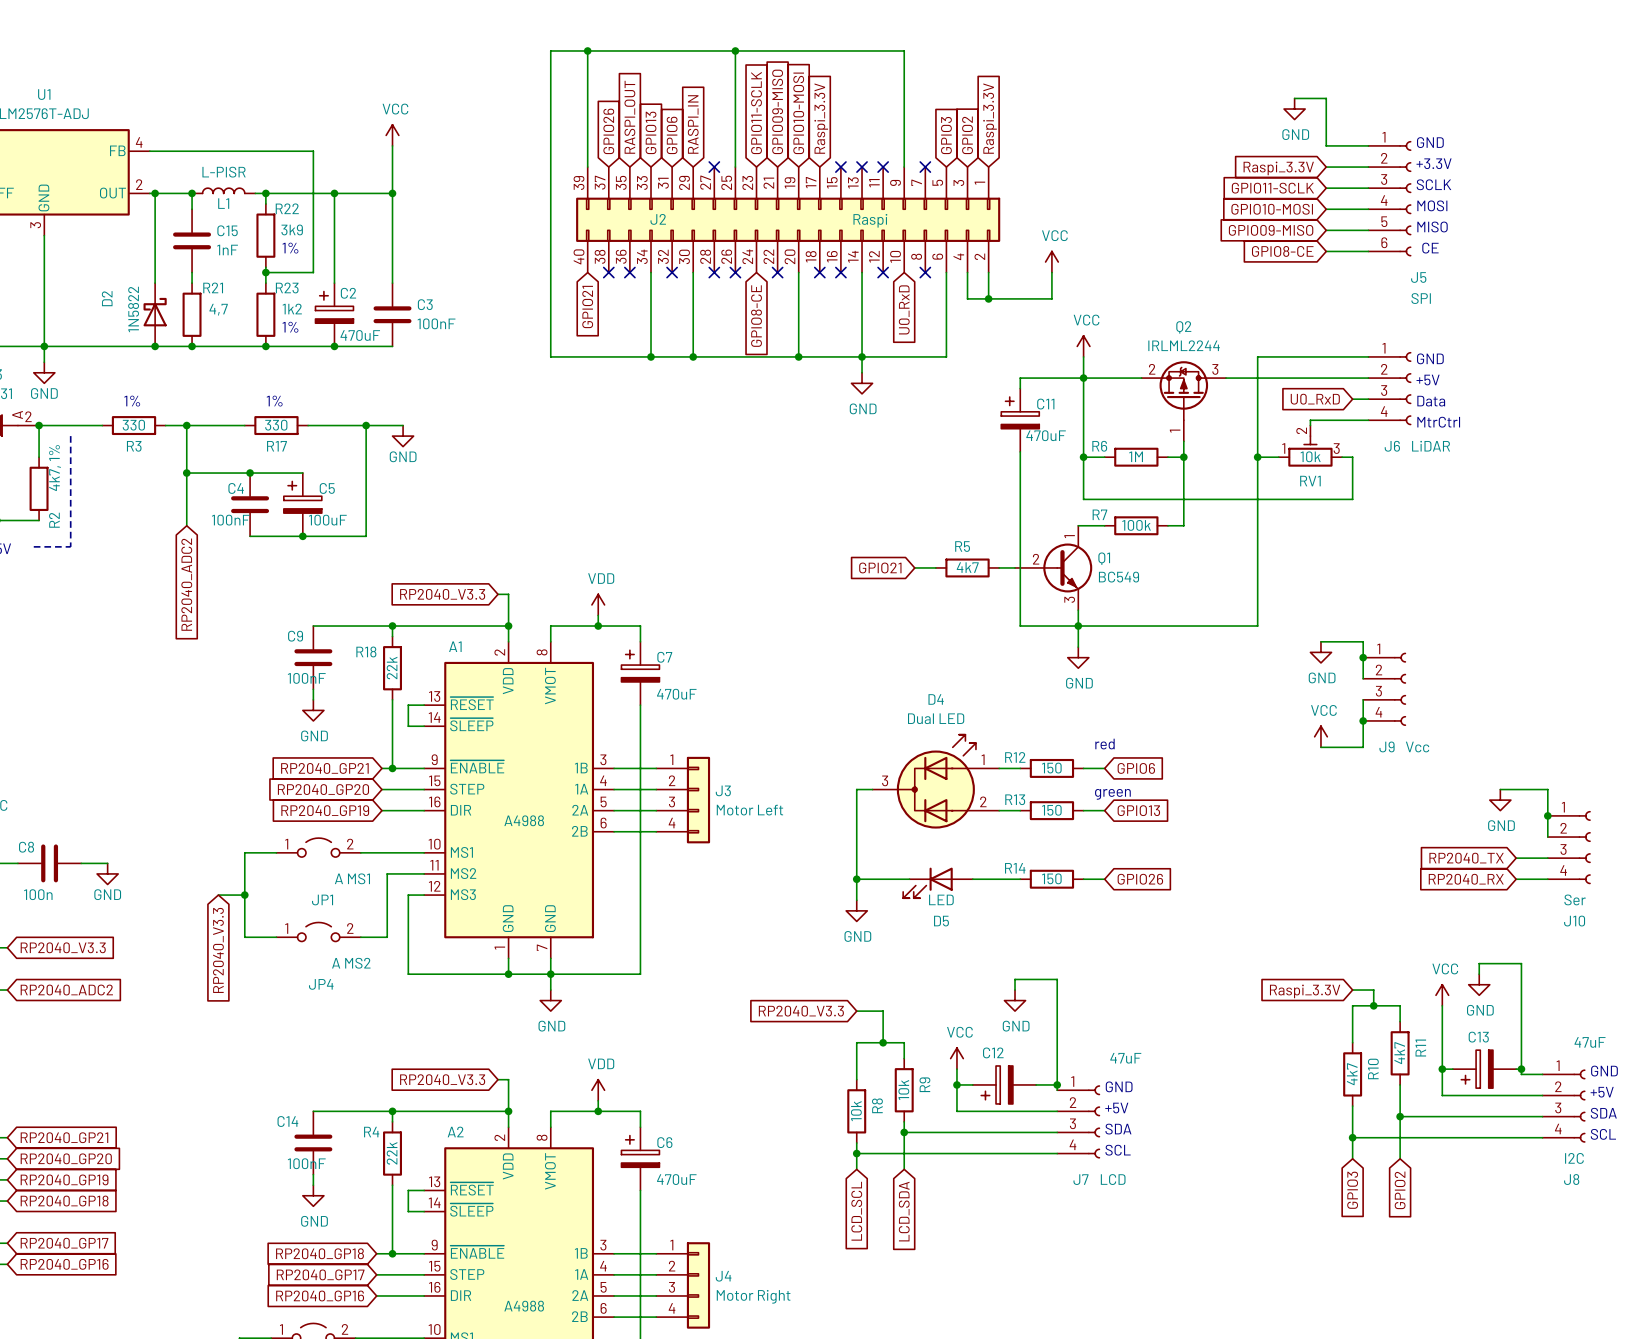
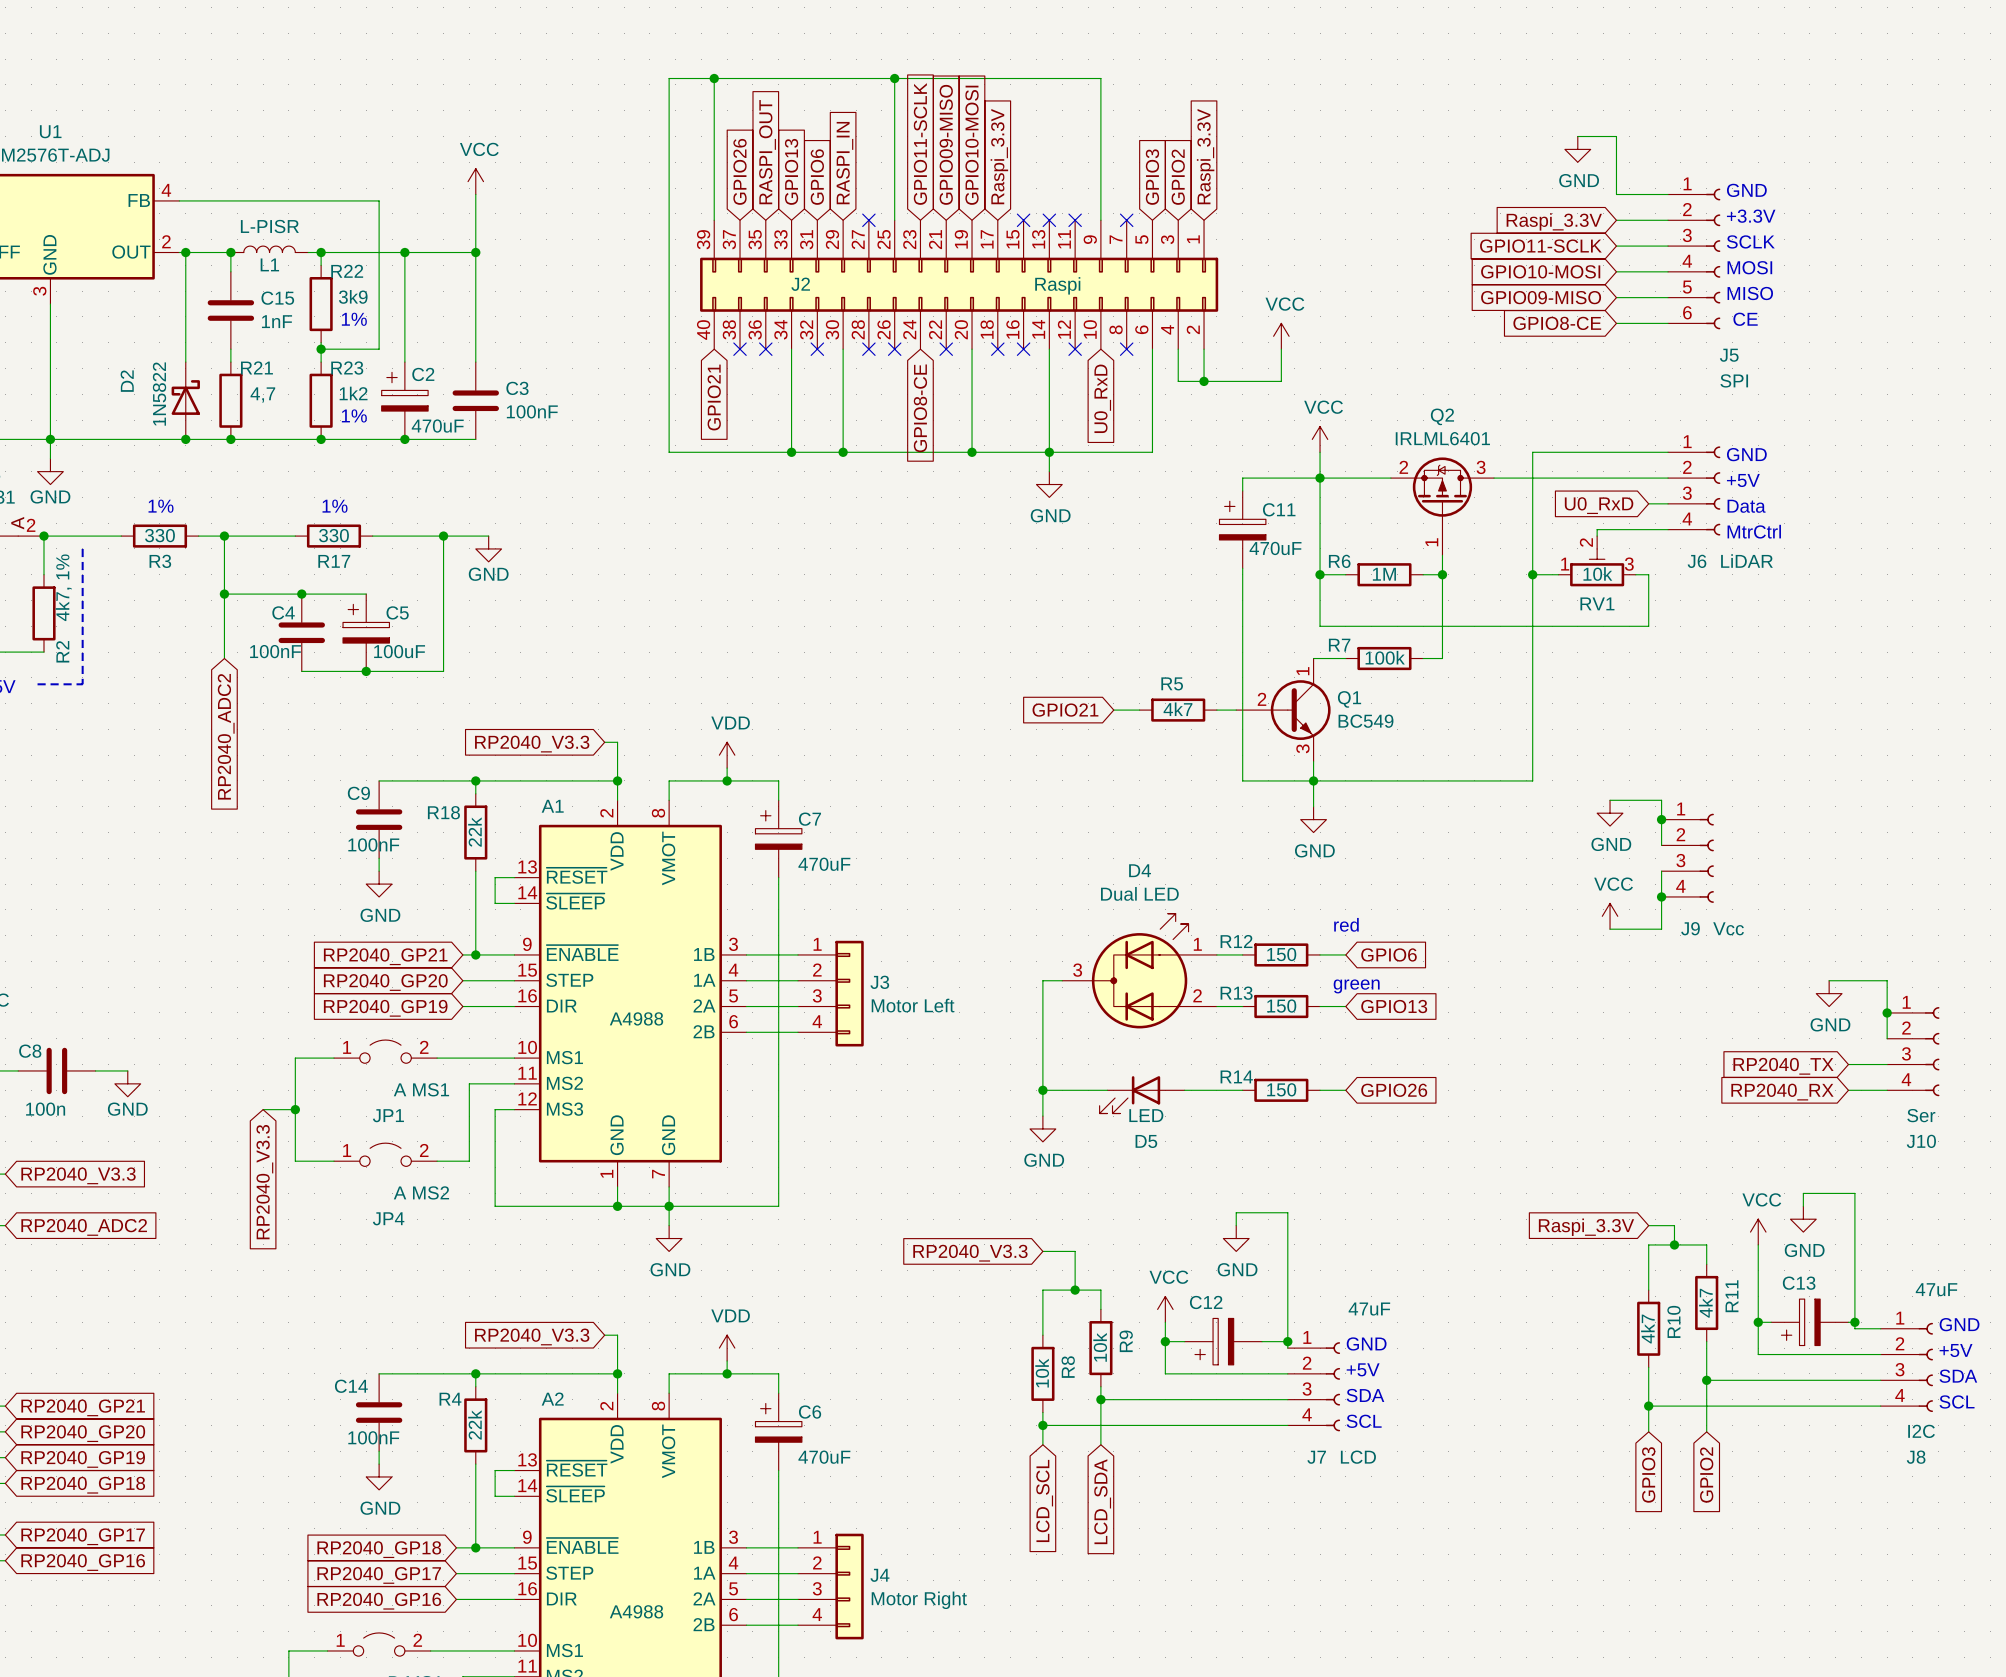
Q2 value: IRLML2244 (1184, 345) -> IRLML6401 (1442, 438)

